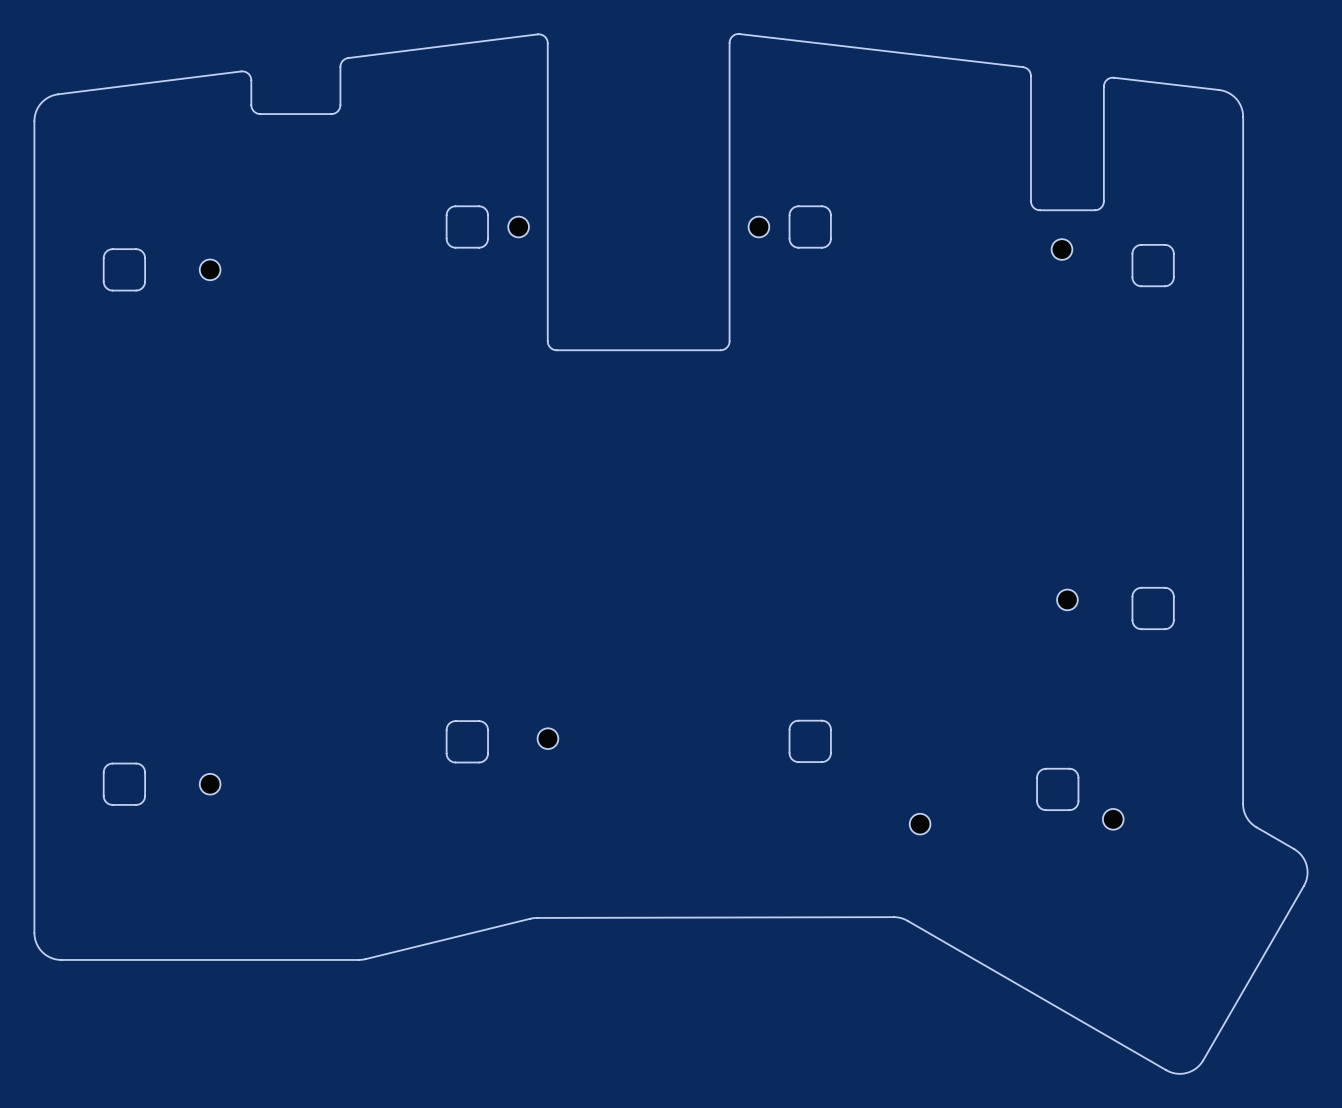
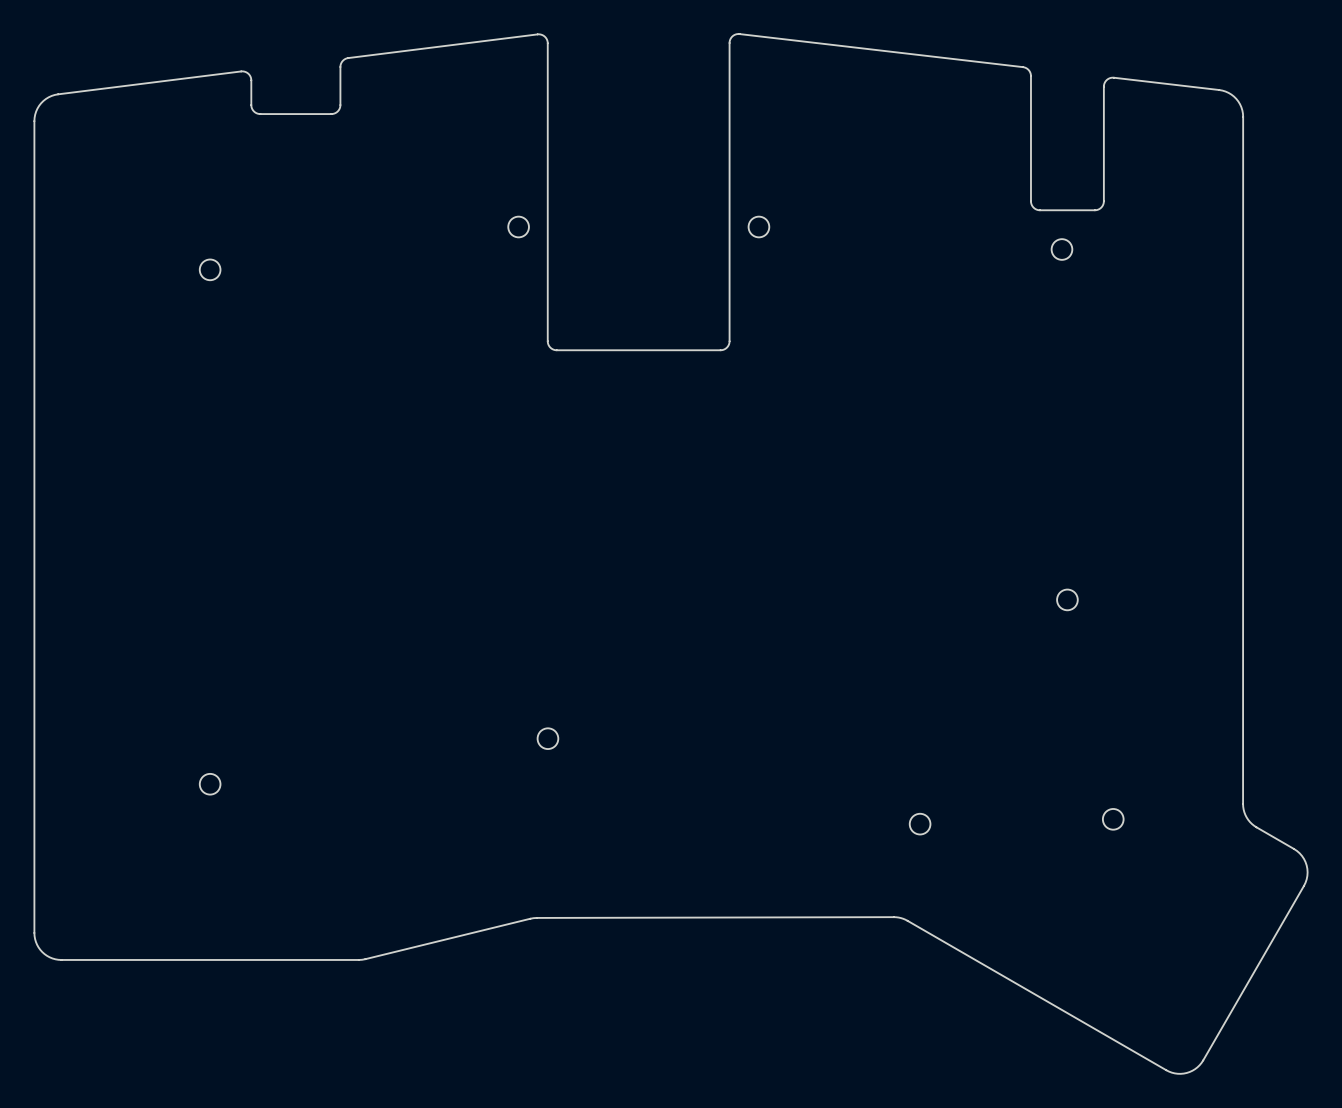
board edge: (455, 206) (480, 206) (486, 209) (487, 214) (488, 238) (484, 245) (479, 247) (455, 247) (448, 244) (446, 238) (446, 213) (450, 208) (455, 206) -> none
board edge: (798, 206) (822, 206) (828, 209) (830, 214) (830, 238) (827, 245) (821, 247) (798, 247) (791, 244) (789, 238) (789, 213) (792, 208) (798, 206) -> none
board edge: (1141, 244) (1166, 244) (1171, 248) (1173, 253) (1173, 277) (1170, 284) (1165, 286) (1141, 286) (1134, 282) (1132, 278) (1132, 252) (1135, 246) (1141, 244) -> none
board edge: (112, 249) (137, 249) (143, 252) (145, 258) (145, 281) (141, 288) (136, 290) (112, 290) (105, 287) (103, 281) (103, 256) (107, 251) (112, 249) -> none
board edge: (1141, 587) (1166, 587) (1171, 591) (1173, 596) (1173, 620) (1170, 627) (1165, 629) (1141, 629) (1134, 625) (1132, 621) (1132, 595) (1135, 589) (1141, 587) -> none
board edge: (798, 720) (822, 720) (828, 724) (830, 728) (830, 753) (827, 760) (821, 762) (798, 762) (791, 758) (789, 753) (789, 727) (792, 722) (798, 720) -> none
board edge: (455, 721) (480, 721) (486, 724) (487, 729) (488, 753) (484, 760) (480, 762) (455, 762) (448, 758) (446, 753) (446, 728) (449, 723) (455, 721) -> none
board edge: (112, 763) (137, 763) (143, 767) (145, 772) (145, 795) (141, 803) (136, 804) (112, 804) (105, 801) (103, 795) (103, 770) (107, 765) (112, 763) -> none
board edge: (1046, 768) (1070, 768) (1076, 772) (1078, 777) (1078, 801) (1075, 808) (1070, 810) (1046, 810) (1039, 806) (1037, 802) (1037, 776) (1039, 771) (1046, 768) -> none

